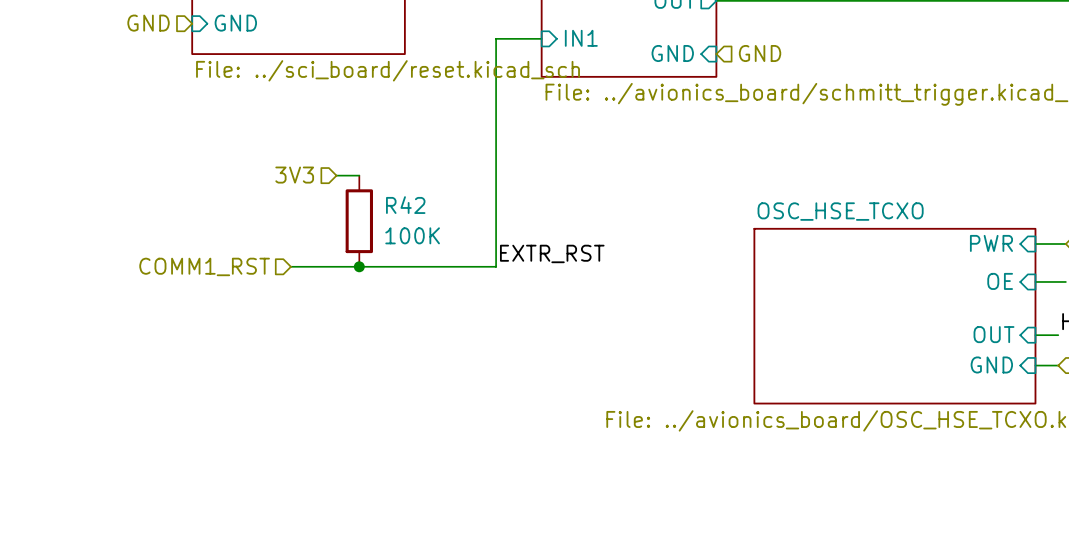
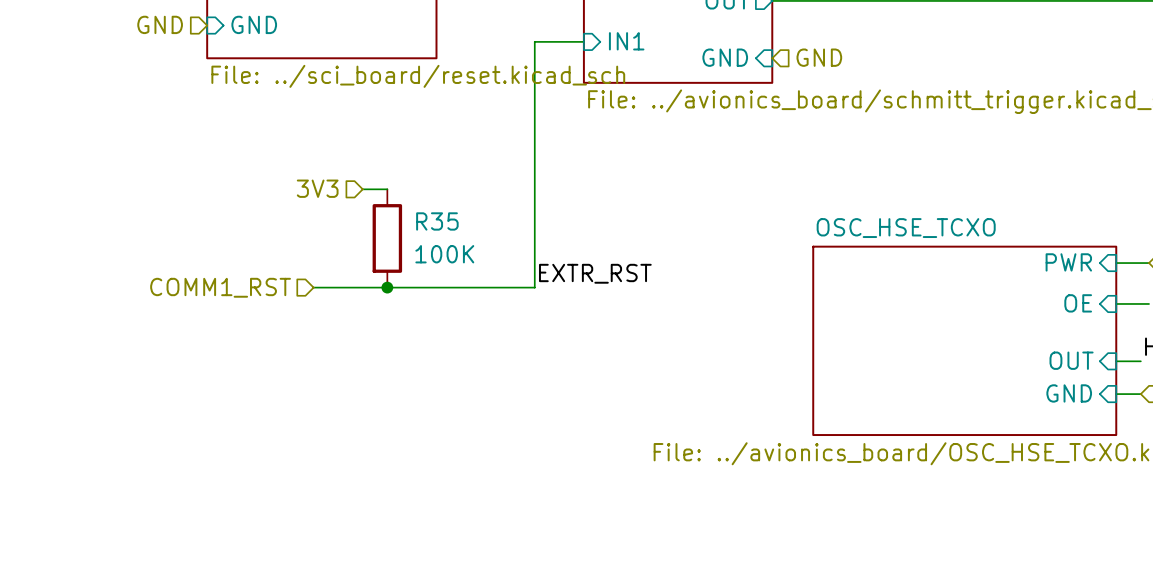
R42 name: R42 (405, 205) -> R35 (437, 221)

